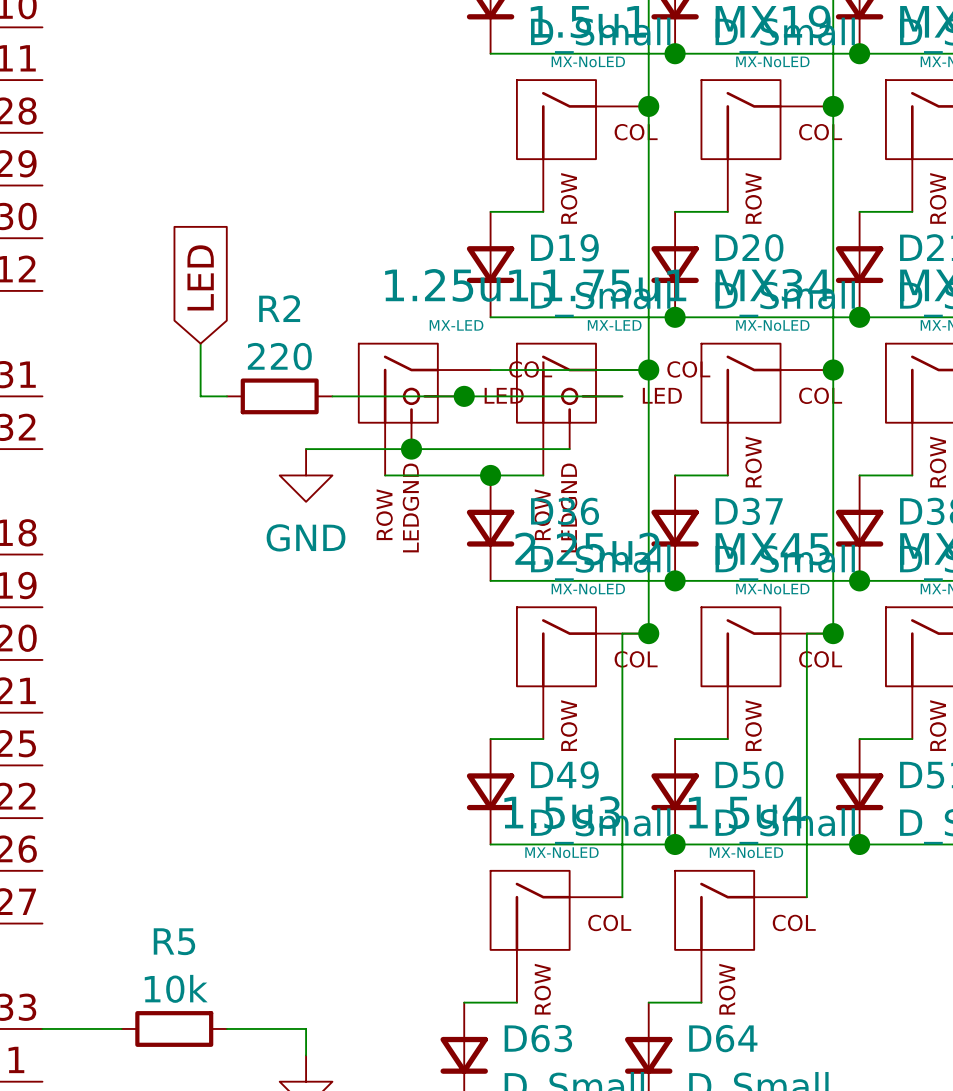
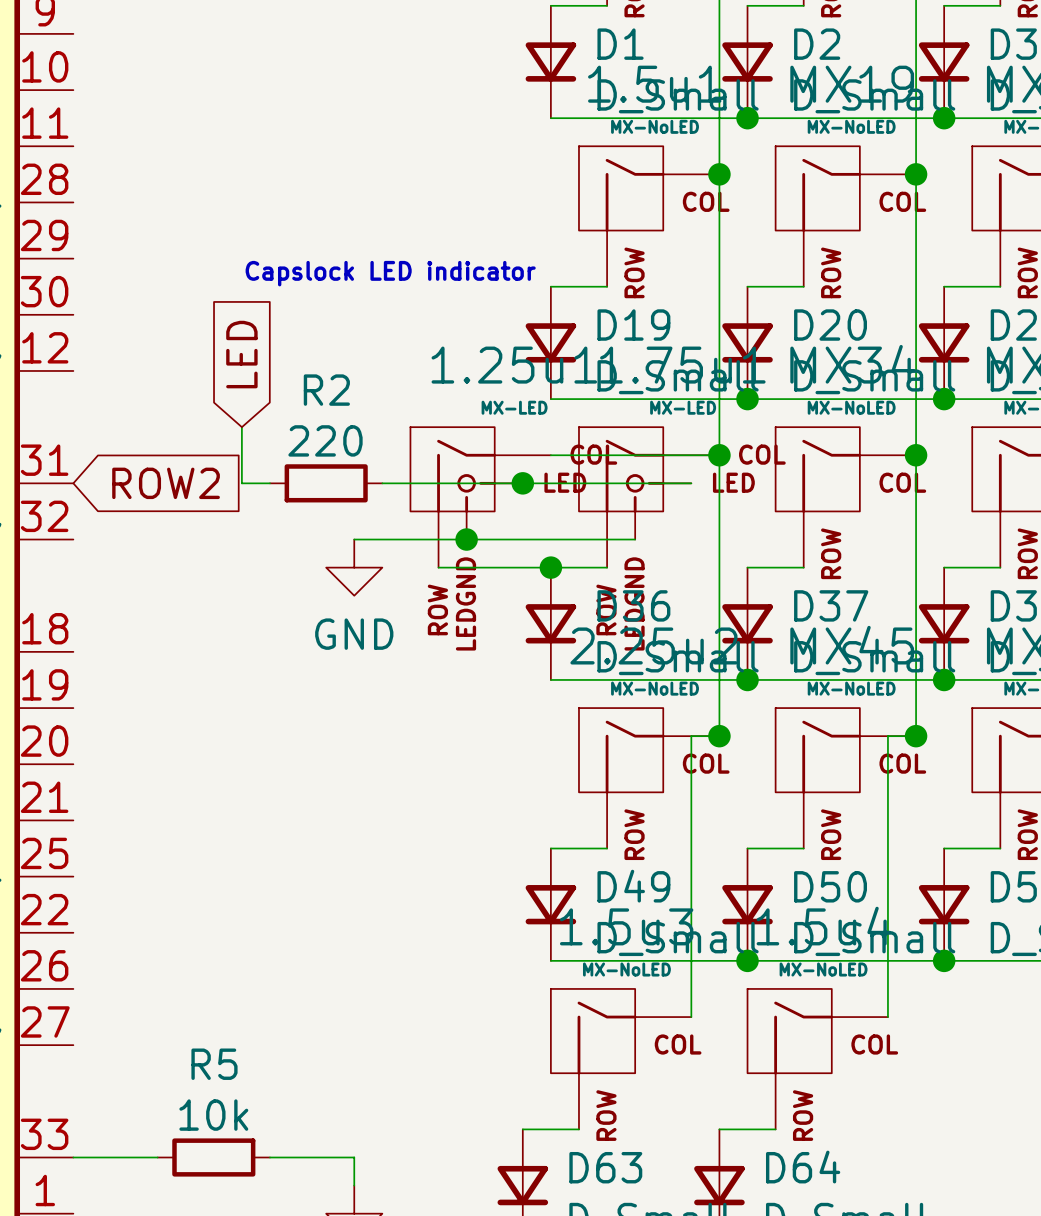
text: none -> Capslock LED indicator (390, 273)
global label: none -> ROW2 (166, 483)

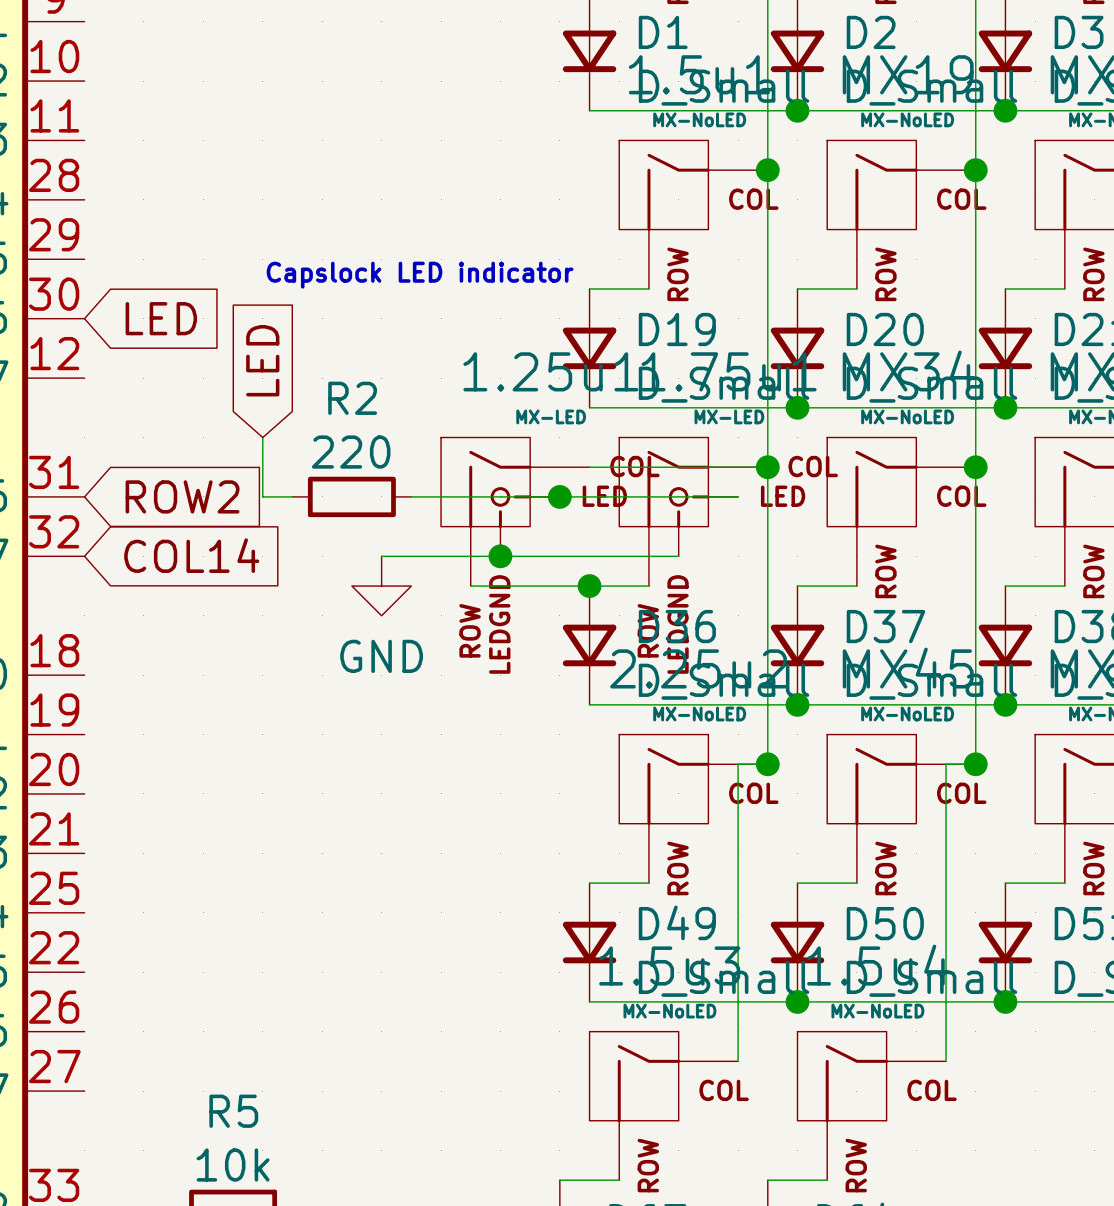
global label: none -> LED (161, 318)
global label: none -> COL14 (191, 555)

